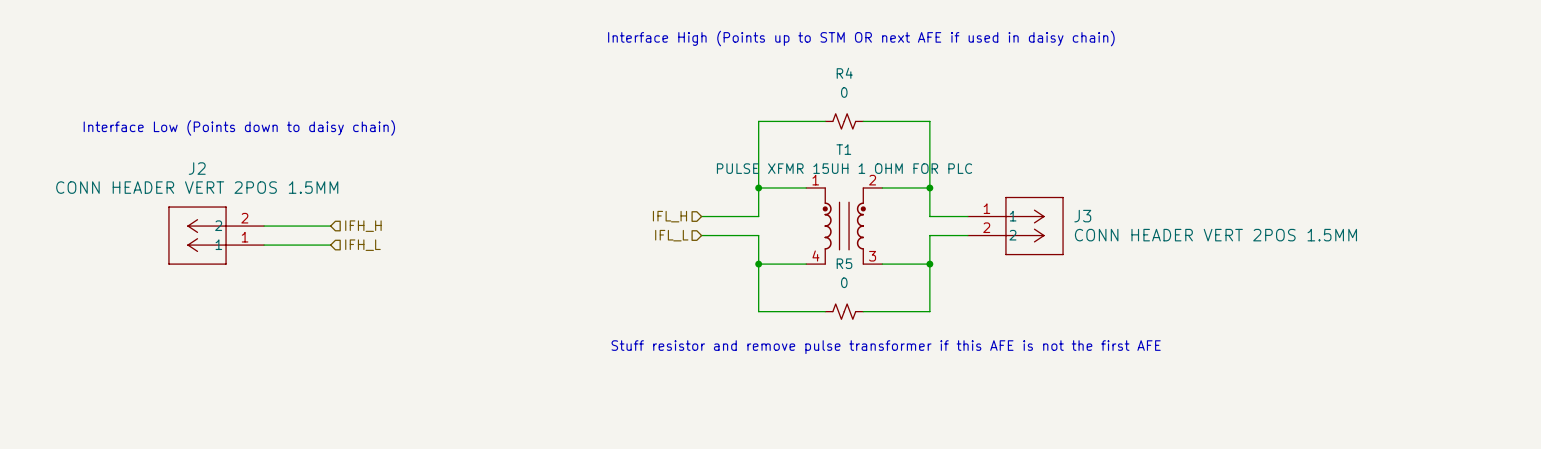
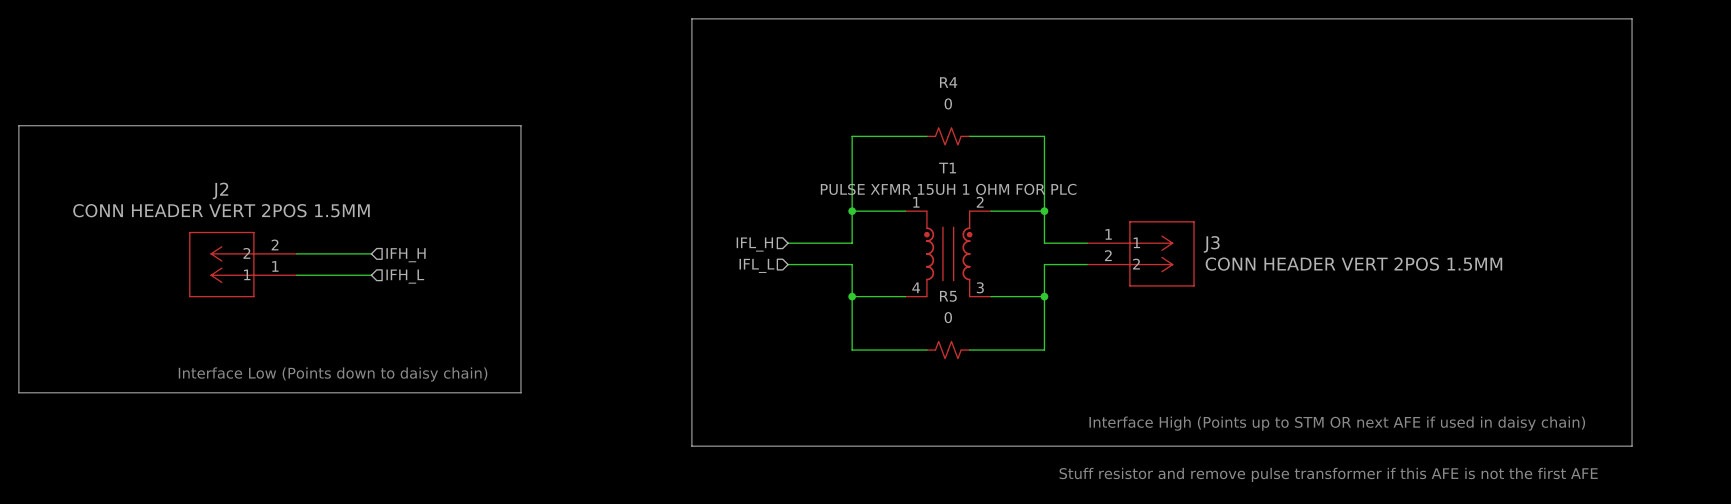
line: none -> (691, 18) (1632, 18) (1632, 446) (691, 446) (691, 18)
text: Interface High (Points up to STM OR next AFE if used in daisy chain) (861, 38) -> none
line: none -> (18, 125) (18, 392) (520, 392) (520, 125) (18, 125)
text: Interface Low (Points down to daisy chain) (239, 127) -> none
text: none -> Interface Low (Points down to daisy chain) (333, 374)
text: Stuff resistor and remove pulse transformer if this AFE is not the first AFE (886, 347) -> none
text: none -> Interface High (Points up to STM OR next AFE if used in daisy chain) (1337, 423)
text: none -> Stuff resistor and remove pulse transformer if this AFE is not the first AFE (1328, 474)

